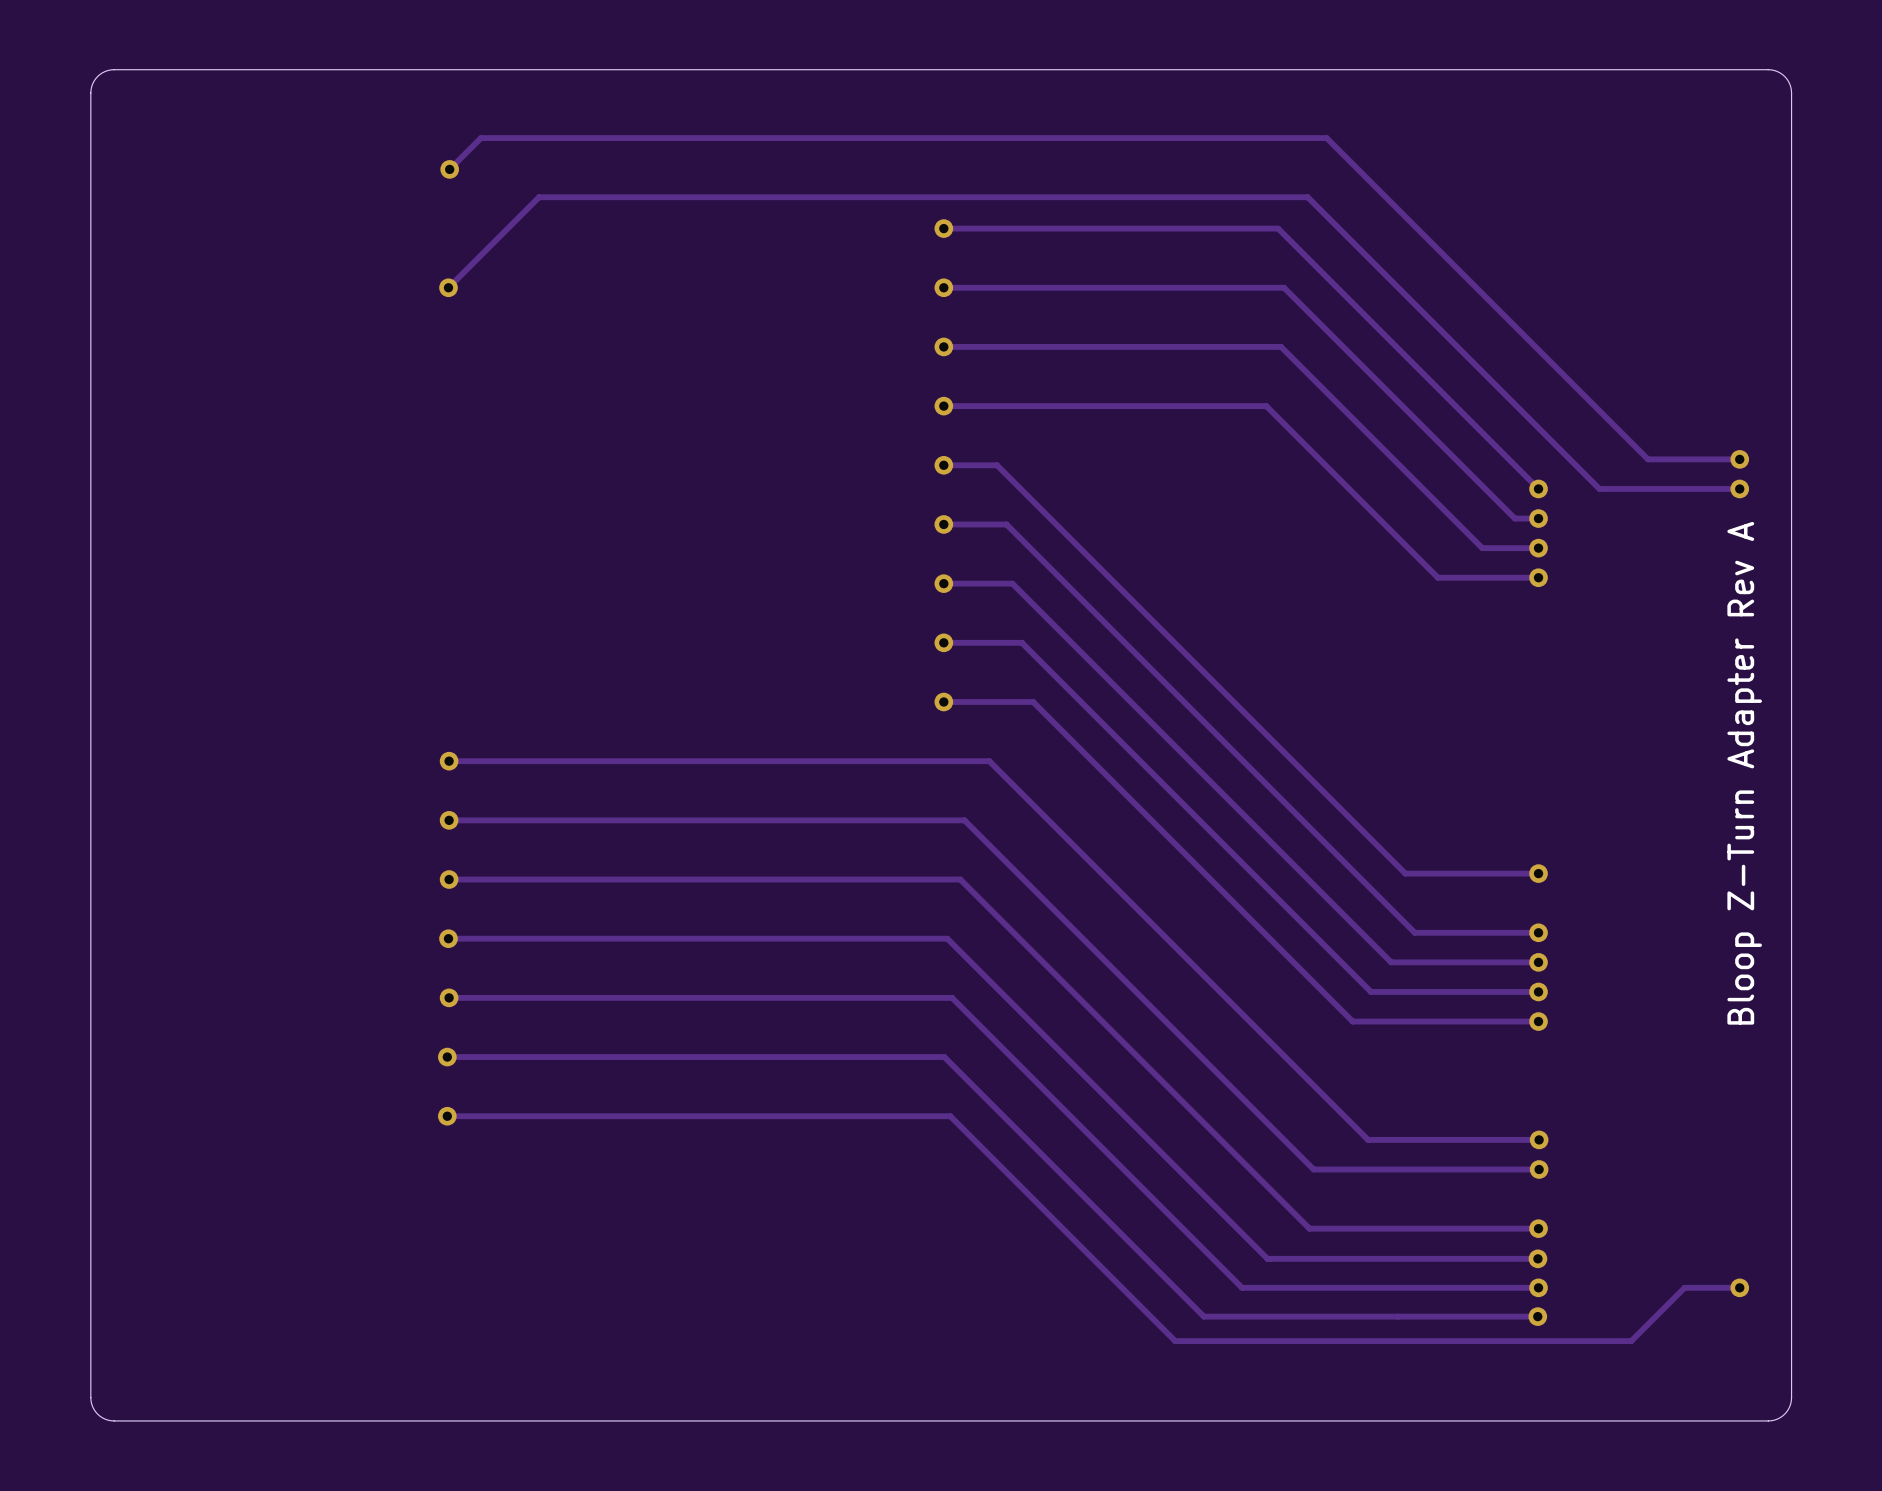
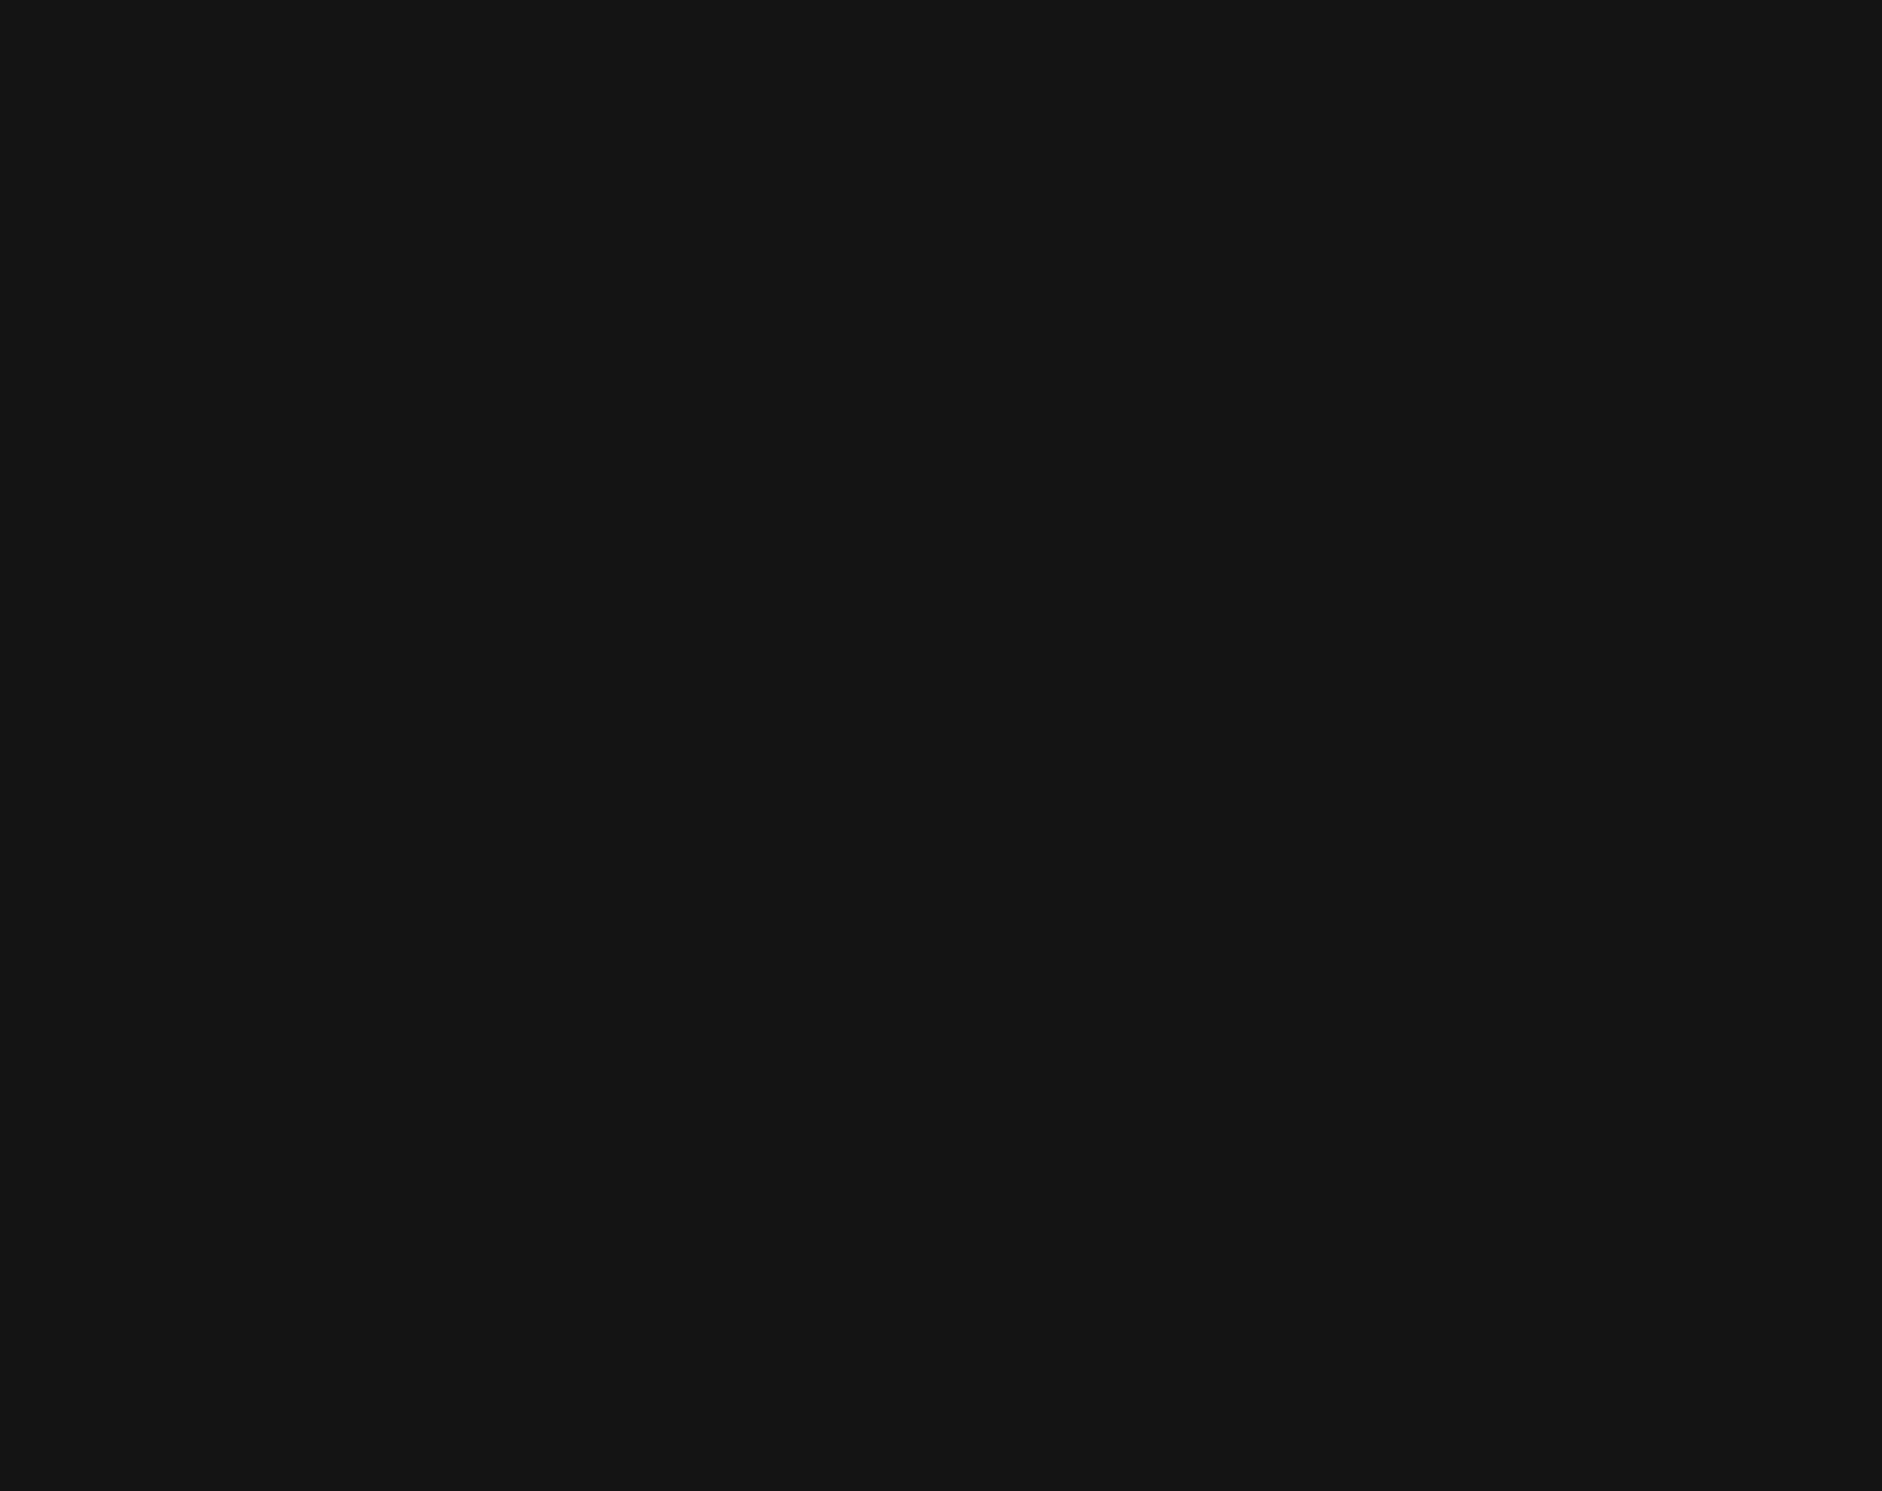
board edge: (1768, 69) (114, 69) (99, 74) (93, 81) (90, 92) (90, 1397) (95, 1411) (105, 1419) (114, 1420) (1768, 1420) (1782, 1416) (1789, 1406) (1791, 1397) (1791, 92) (1789, 84) (1784, 76) (1777, 71) (1768, 69) -> none
track: (449, 169) (481, 138) (1326, 138) (1648, 459) (1739, 459) -> none
via: (449, 169) -> none
track: (943, 228) (1278, 228) (1538, 488) -> none
via: (943, 228) -> none
track: (448, 287) (539, 197) (1307, 197) (1599, 488) (1739, 488) -> none
via: (448, 287) -> none
track: (943, 287) (1284, 287) (1514, 518) (1538, 518) -> none
via: (943, 287) -> none
track: (943, 346) (1281, 346) (1482, 548) (1538, 548) -> none
via: (943, 346) -> none
track: (943, 406) (1266, 406) (1437, 577) (1538, 577) -> none
via: (943, 406) -> none
via: (1739, 459) -> none
track: (943, 465) (997, 465) (1405, 873) (1538, 873) -> none
via: (943, 465) -> none
via: (1538, 488) -> none
via: (1739, 488) -> none
via: (1538, 518) -> none
track: (943, 524) (1006, 524) (1414, 932) (1538, 932) -> none
via: (943, 524) -> none
via: (1538, 548) -> none
via: (1538, 577) -> none
track: (943, 583) (1012, 583) (1391, 962) (1538, 962) -> none
via: (943, 583) -> none
track: (943, 642) (1021, 642) (1371, 991) (1538, 991) -> none
via: (943, 642) -> none
track: (943, 702) (1033, 702) (1352, 1021) (1538, 1021) -> none
via: (943, 702) -> none
track: (449, 761) (989, 761) (1368, 1139) (1539, 1139) -> none
via: (449, 761) -> none
text: Bloop Z-Turn Adapter Rev A (1744, 773) -> none
track: (449, 820) (964, 820) (1313, 1169) (1539, 1169) -> none
via: (449, 820) -> none
via: (1538, 873) -> none
track: (449, 879) (960, 879) (1309, 1228) (1538, 1228) -> none
via: (449, 879) -> none
via: (1538, 932) -> none
track: (448, 938) (947, 938) (1267, 1258) (1537, 1258) -> none
via: (448, 938) -> none
via: (1538, 962) -> none
via: (1538, 991) -> none
track: (449, 997) (952, 997) (1242, 1287) (1538, 1287) -> none
via: (449, 997) -> none
via: (1538, 1021) -> none
track: (447, 1057) (944, 1057) (1203, 1316) (1537, 1316) -> none
via: (447, 1057) -> none
track: (447, 1116) (950, 1116) (1175, 1341) (1631, 1341) (1684, 1287) (1739, 1287) -> none
via: (447, 1116) -> none
via: (1539, 1139) -> none
via: (1539, 1169) -> none
via: (1538, 1228) -> none
via: (1537, 1258) -> none
via: (1538, 1287) -> none
via: (1739, 1287) -> none
via: (1537, 1316) -> none

